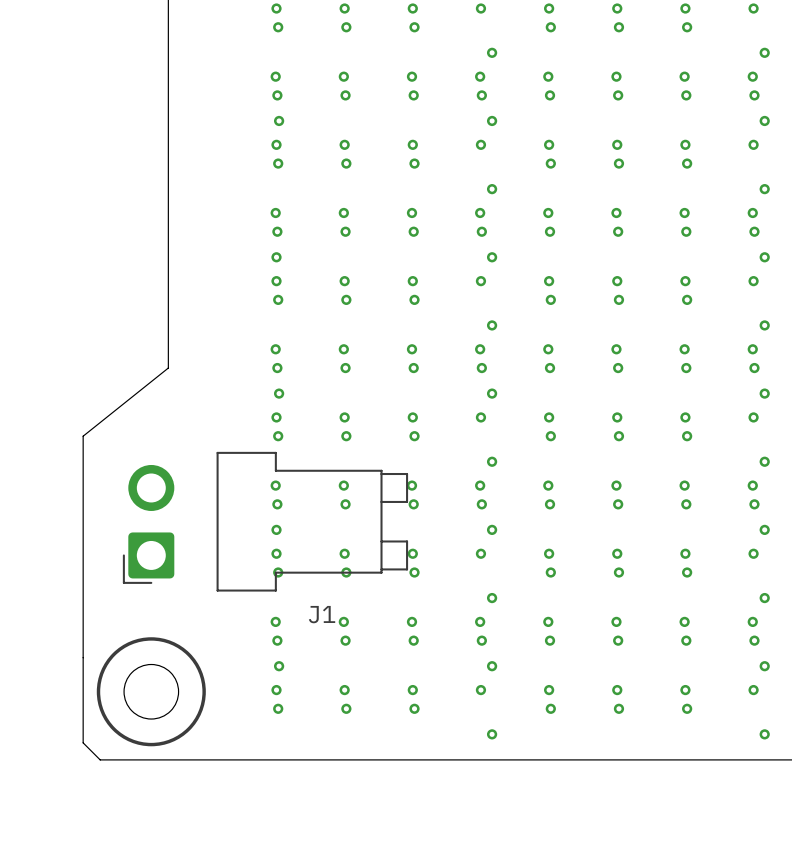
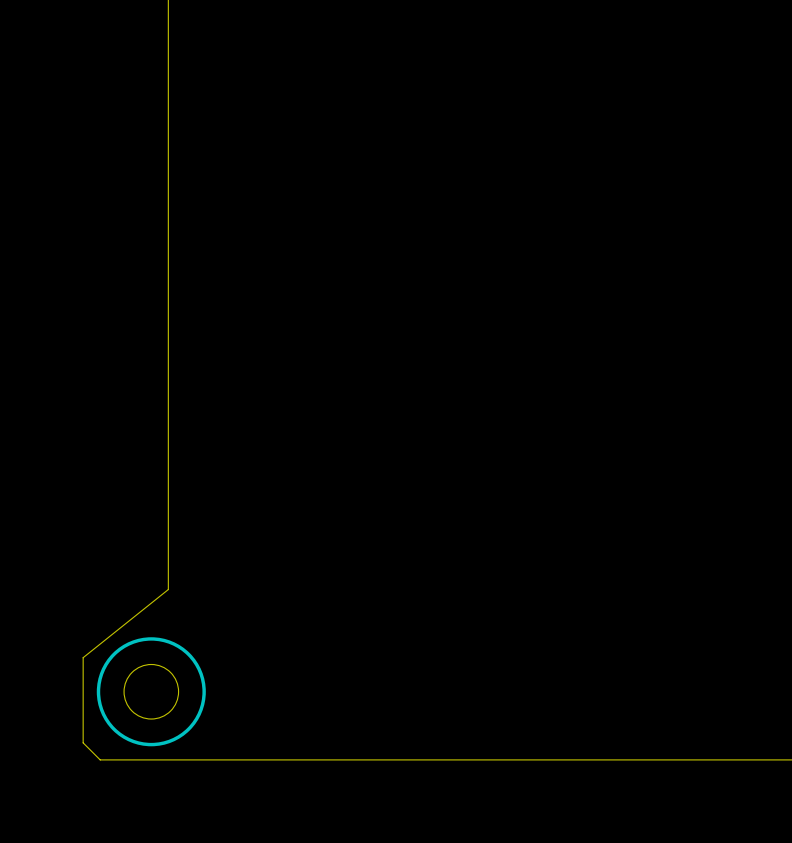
via: (276, 8) -> none
via: (344, 8) -> none
via: (412, 8) -> none
via: (480, 8) -> none
via: (549, 8) -> none
via: (617, 8) -> none
via: (685, 8) -> none
via: (753, 8) -> none
via: (278, 27) -> none
via: (346, 27) -> none
via: (414, 27) -> none
via: (550, 27) -> none
via: (618, 27) -> none
via: (687, 27) -> none
via: (492, 52) -> none
via: (764, 52) -> none
via: (275, 76) -> none
via: (343, 76) -> none
via: (412, 76) -> none
via: (480, 76) -> none
via: (548, 76) -> none
via: (616, 76) -> none
via: (684, 76) -> none
via: (752, 76) -> none
via: (277, 95) -> none
via: (345, 95) -> none
via: (413, 95) -> none
via: (481, 95) -> none
via: (550, 95) -> none
via: (618, 95) -> none
via: (686, 95) -> none
via: (754, 95) -> none
via: (279, 120) -> none
via: (492, 120) -> none
via: (764, 120) -> none
via: (276, 144) -> none
via: (344, 144) -> none
via: (412, 144) -> none
via: (480, 144) -> none
via: (549, 144) -> none
via: (617, 144) -> none
via: (685, 144) -> none
via: (753, 144) -> none
via: (278, 163) -> none
via: (346, 163) -> none
via: (414, 163) -> none
via: (550, 163) -> none
via: (618, 163) -> none
via: (687, 163) -> none
via: (492, 189) -> none
via: (764, 189) -> none
via: (275, 212) -> none
via: (343, 212) -> none
via: (412, 212) -> none
via: (480, 212) -> none
via: (548, 212) -> none
via: (616, 212) -> none
via: (684, 212) -> none
via: (752, 212) -> none
via: (277, 231) -> none
via: (345, 231) -> none
via: (413, 231) -> none
via: (481, 231) -> none
via: (550, 231) -> none
via: (618, 231) -> none
via: (686, 231) -> none
via: (754, 231) -> none
via: (276, 257) -> none
via: (492, 257) -> none
via: (764, 257) -> none
via: (276, 281) -> none
via: (344, 281) -> none
via: (412, 281) -> none
via: (480, 281) -> none
via: (549, 281) -> none
via: (617, 281) -> none
via: (685, 281) -> none
via: (753, 281) -> none
via: (278, 299) -> none
via: (346, 299) -> none
via: (414, 299) -> none
via: (550, 299) -> none
via: (618, 299) -> none
via: (687, 299) -> none
via: (492, 325) -> none
via: (764, 325) -> none
via: (275, 349) -> none
via: (343, 349) -> none
via: (412, 349) -> none
via: (480, 349) -> none
via: (548, 349) -> none
via: (616, 349) -> none
via: (684, 349) -> none
via: (752, 349) -> none
board edge: (168, 368) (83, 436) (83, 657) -> (168, 368) (168, 589) (83, 657)
via: (277, 368) -> none
via: (345, 368) -> none
via: (413, 368) -> none
via: (481, 368) -> none
via: (550, 368) -> none
via: (618, 368) -> none
via: (686, 368) -> none
via: (754, 368) -> none
via: (279, 393) -> none
via: (492, 393) -> none
via: (764, 393) -> none
via: (276, 417) -> none
via: (344, 417) -> none
via: (412, 417) -> none
via: (480, 417) -> none
via: (549, 417) -> none
via: (617, 417) -> none
via: (685, 417) -> none
via: (753, 417) -> none
via: (278, 436) -> none
via: (346, 436) -> none
via: (414, 436) -> none
via: (550, 436) -> none
via: (618, 436) -> none
via: (687, 436) -> none
via: (492, 461) -> none
via: (764, 461) -> none
via: (275, 485) -> none
via: (343, 485) -> none
via: (412, 485) -> none
via: (480, 485) -> none
via: (548, 485) -> none
via: (616, 485) -> none
via: (684, 485) -> none
via: (752, 485) -> none
via: (277, 504) -> none
via: (345, 504) -> none
via: (413, 504) -> none
via: (481, 504) -> none
via: (550, 504) -> none
via: (618, 504) -> none
via: (686, 504) -> none
via: (754, 504) -> none
J1: (265, 521) -> none
via: (276, 529) -> none
via: (492, 529) -> none
via: (764, 529) -> none
via: (276, 553) -> none
via: (344, 553) -> none
via: (412, 553) -> none
via: (480, 553) -> none
via: (549, 553) -> none
via: (617, 553) -> none
via: (685, 553) -> none
via: (753, 553) -> none
via: (278, 572) -> none
via: (346, 572) -> none
via: (414, 572) -> none
via: (550, 572) -> none
via: (618, 572) -> none
via: (687, 572) -> none
via: (492, 598) -> none
via: (764, 598) -> none
via: (275, 621) -> none
via: (343, 621) -> none
via: (412, 621) -> none
via: (480, 621) -> none
via: (548, 621) -> none
via: (616, 621) -> none
via: (684, 621) -> none
via: (752, 621) -> none
via: (277, 640) -> none
via: (345, 640) -> none
via: (413, 640) -> none
via: (481, 640) -> none
via: (550, 640) -> none
via: (618, 640) -> none
via: (686, 640) -> none
via: (754, 640) -> none
via: (279, 666) -> none
via: (492, 666) -> none
via: (764, 666) -> none
via: (276, 690) -> none
via: (344, 690) -> none
via: (412, 690) -> none
via: (480, 690) -> none
via: (549, 690) -> none
via: (617, 690) -> none
via: (685, 690) -> none
via: (753, 690) -> none
via: (278, 708) -> none
via: (346, 708) -> none
via: (414, 708) -> none
via: (550, 708) -> none
via: (618, 708) -> none
via: (687, 708) -> none
via: (492, 734) -> none
via: (764, 734) -> none

